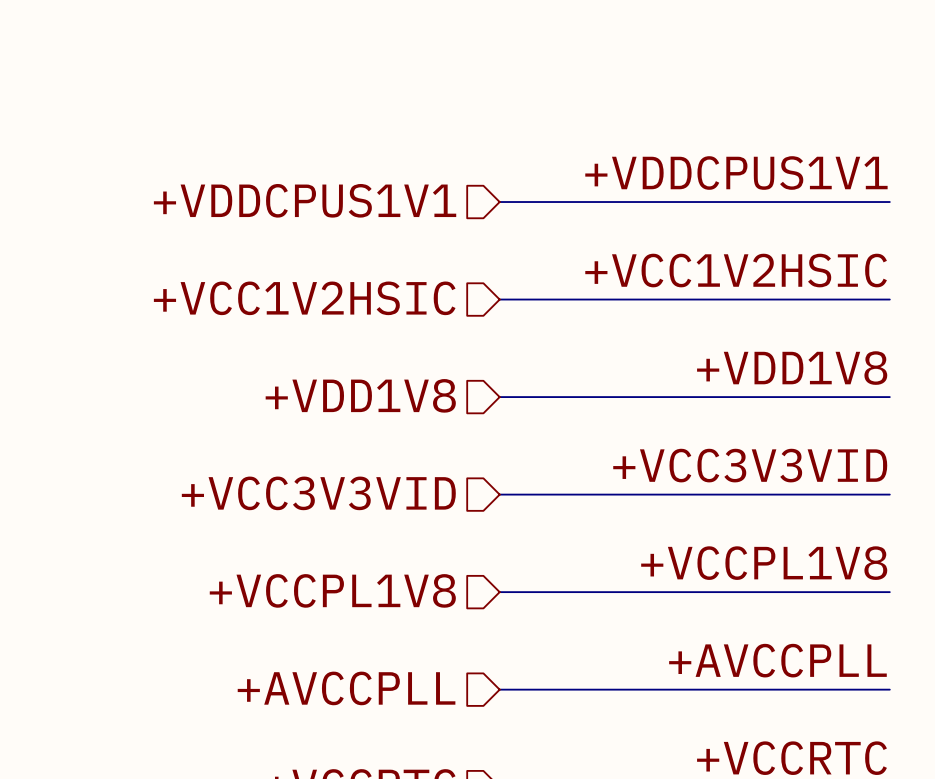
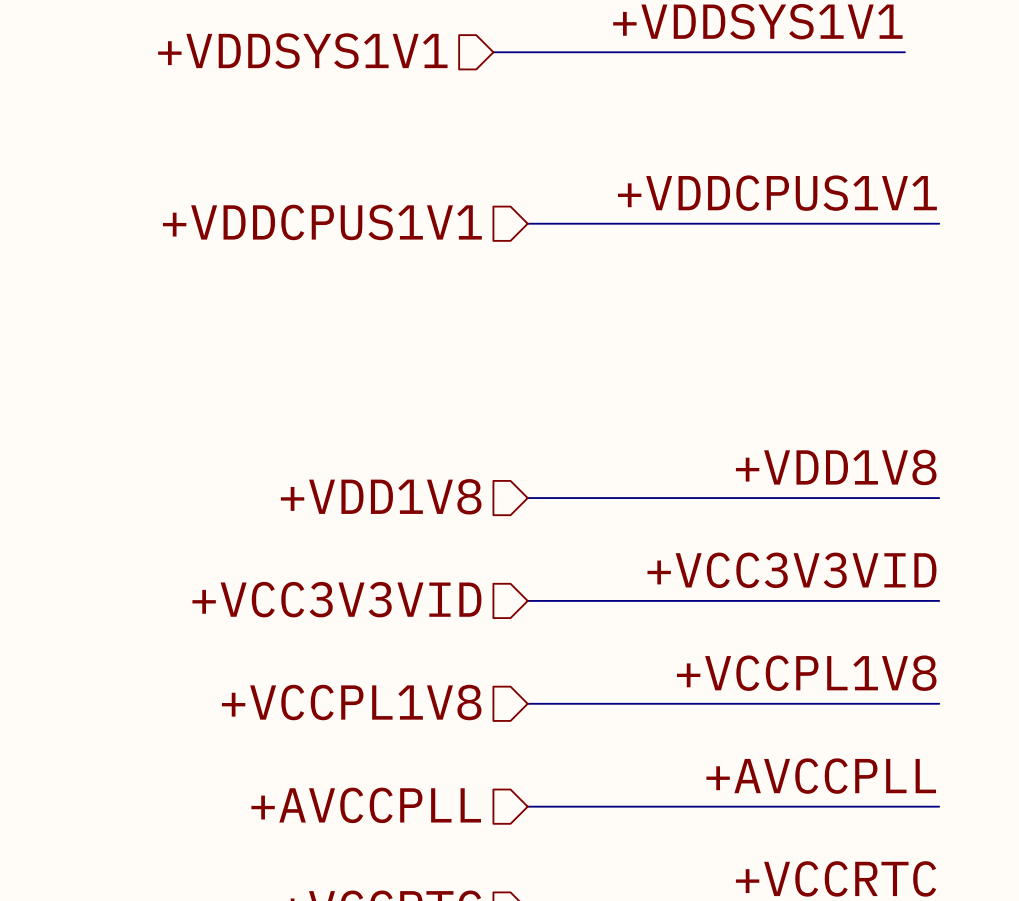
label position: +VDDCPUS1V1 (736, 173) -> +VDDCPUS1V1 (777, 193)
hierarchical label position: +VDDCPUS1V1 (305, 200) -> +VDDCPUS1V1 (322, 222)
wire: (499, 202) (889, 202) -> (527, 223) (939, 223)
label: +VCC1V2HSIC (736, 270) -> none
hierarchical label: +VCC1V2HSIC (304, 298) -> none
wire: (499, 299) (889, 299) -> none

